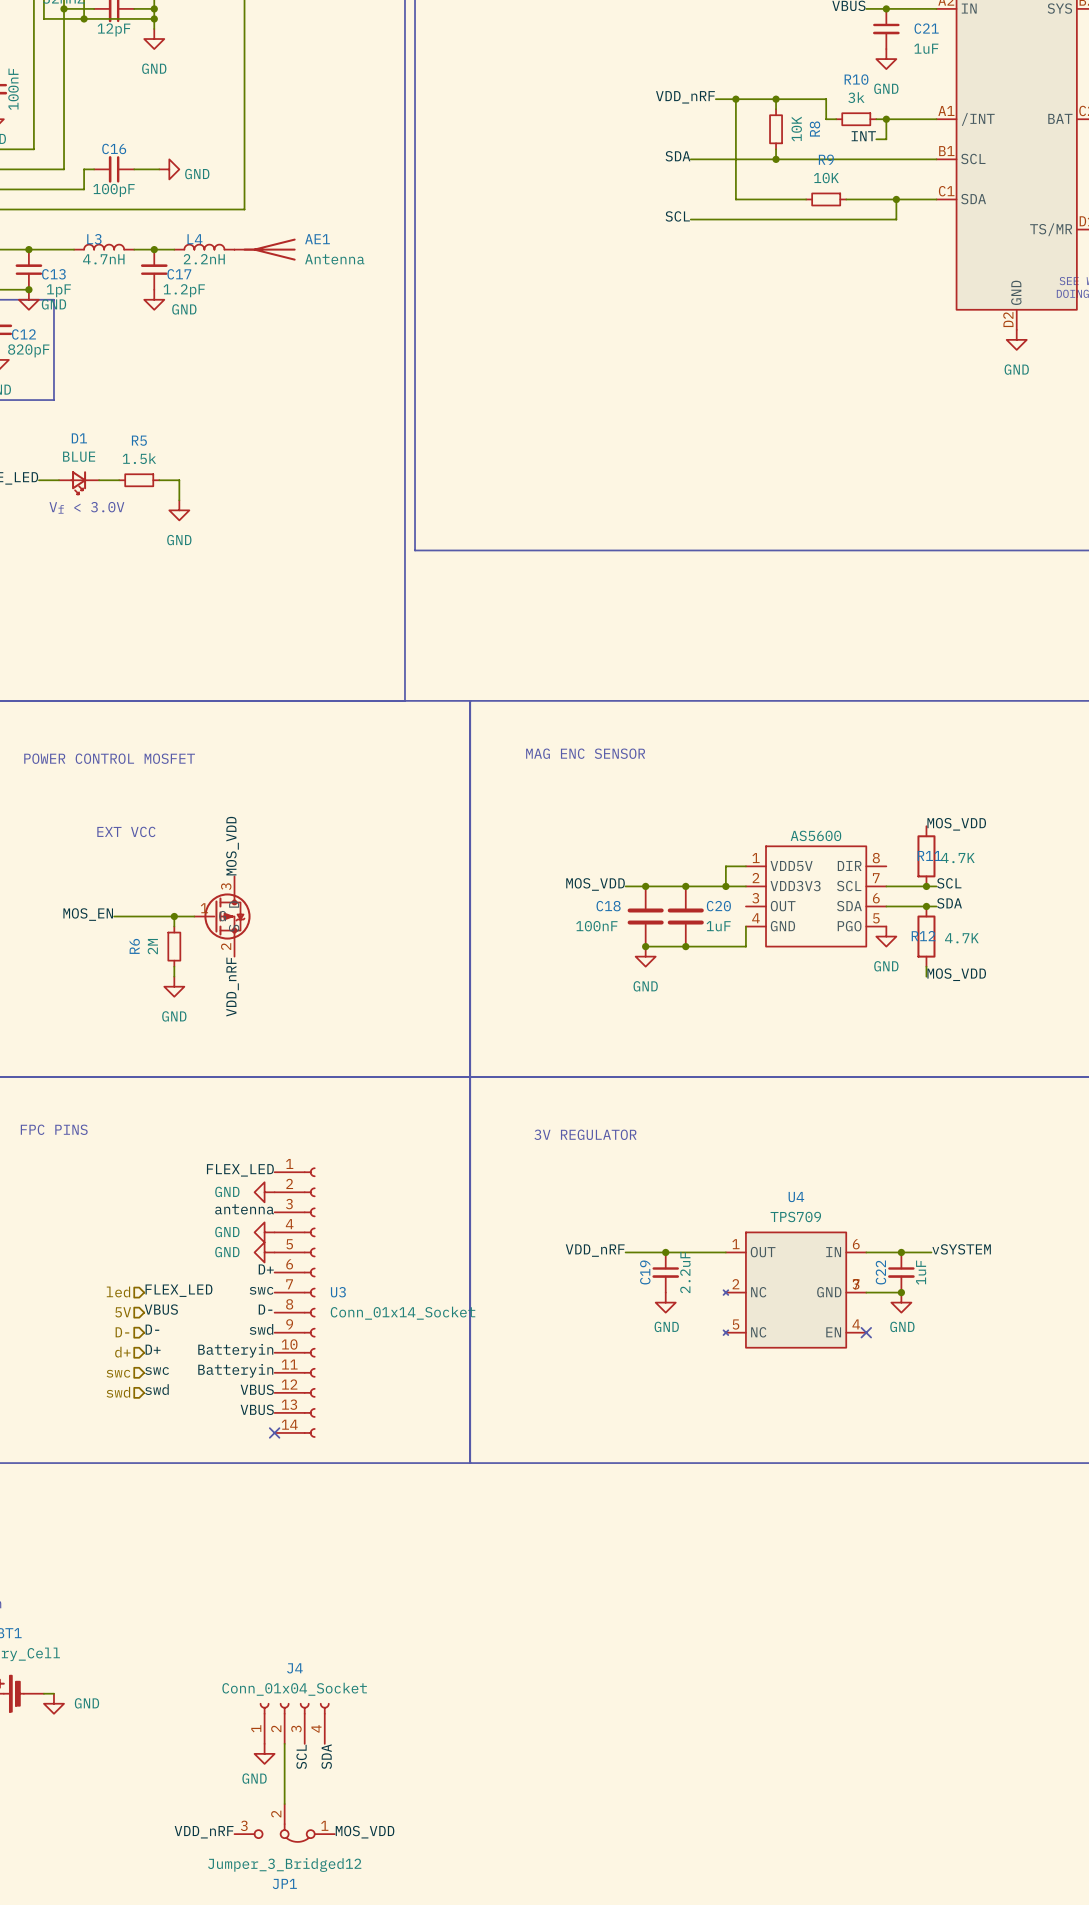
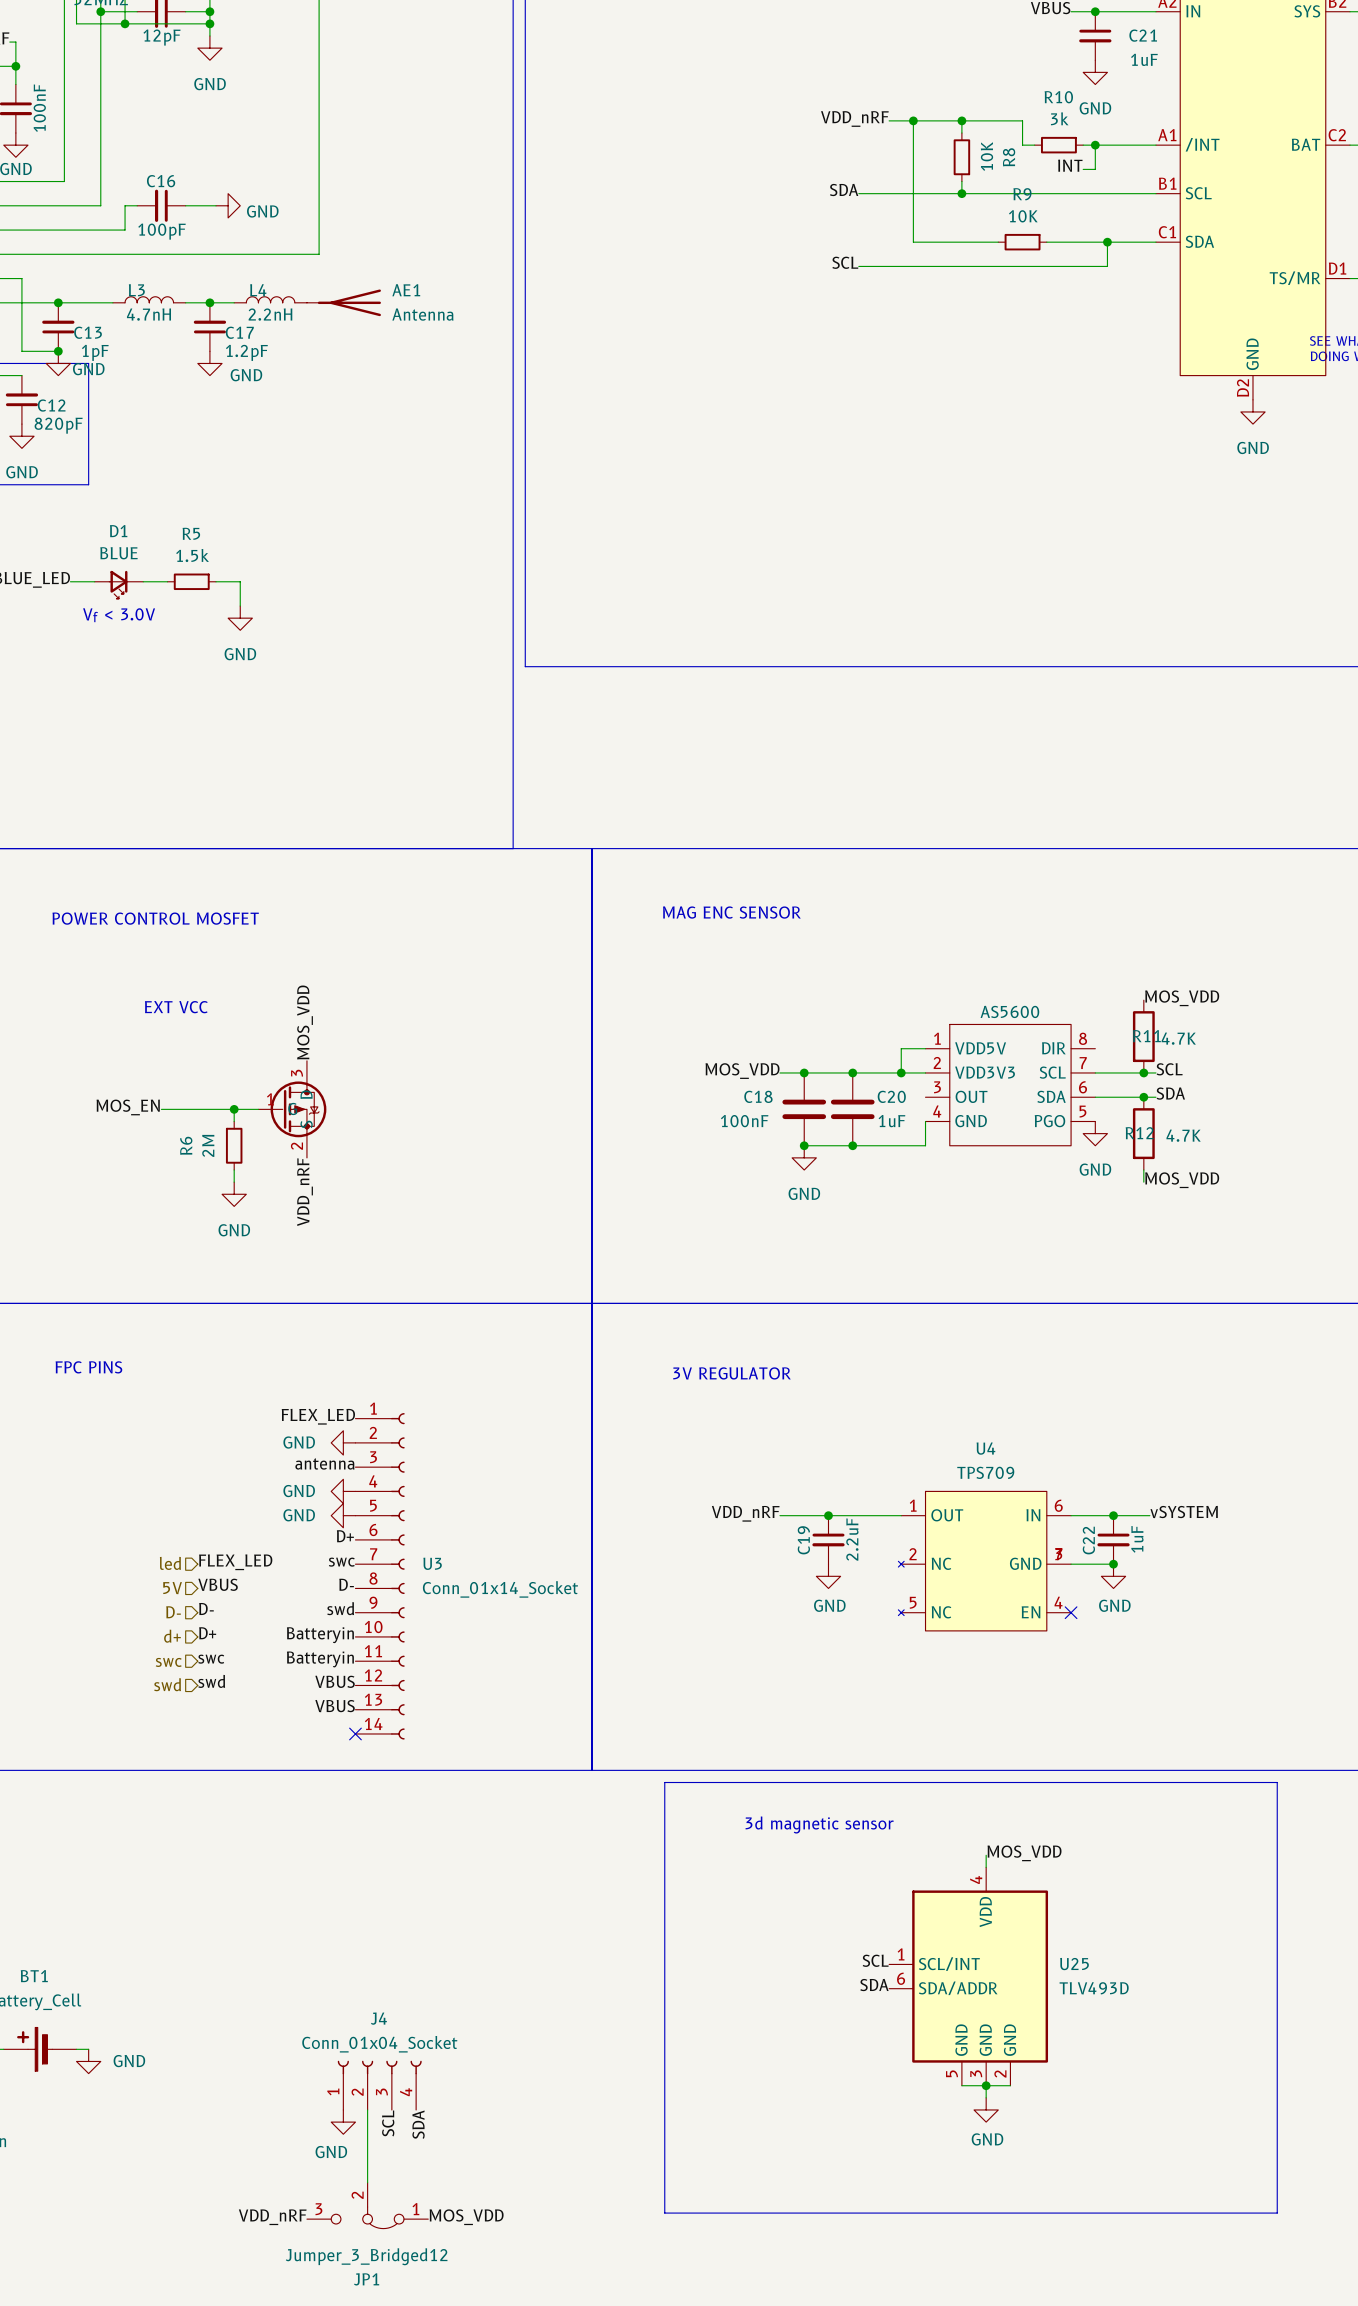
line: none -> (664, 1782) (1277, 1782) (1277, 2213) (664, 2213) (664, 1782)
text: none -> 3d magnetic sensor (819, 1824)
label: none -> MOS_VDD (1024, 1853)
wire: none -> (986, 1855) (986, 1867)
label: none -> SCL (875, 1960)
U25: none -> TLV493D (968, 1976)
label: none -> SDA (874, 1985)
wire: none -> (961, 2085) (1010, 2085)
wire: none -> (986, 2085) (986, 2097)
junction: none -> (986, 2085)
power symbol: none -> GND (986, 2109)

